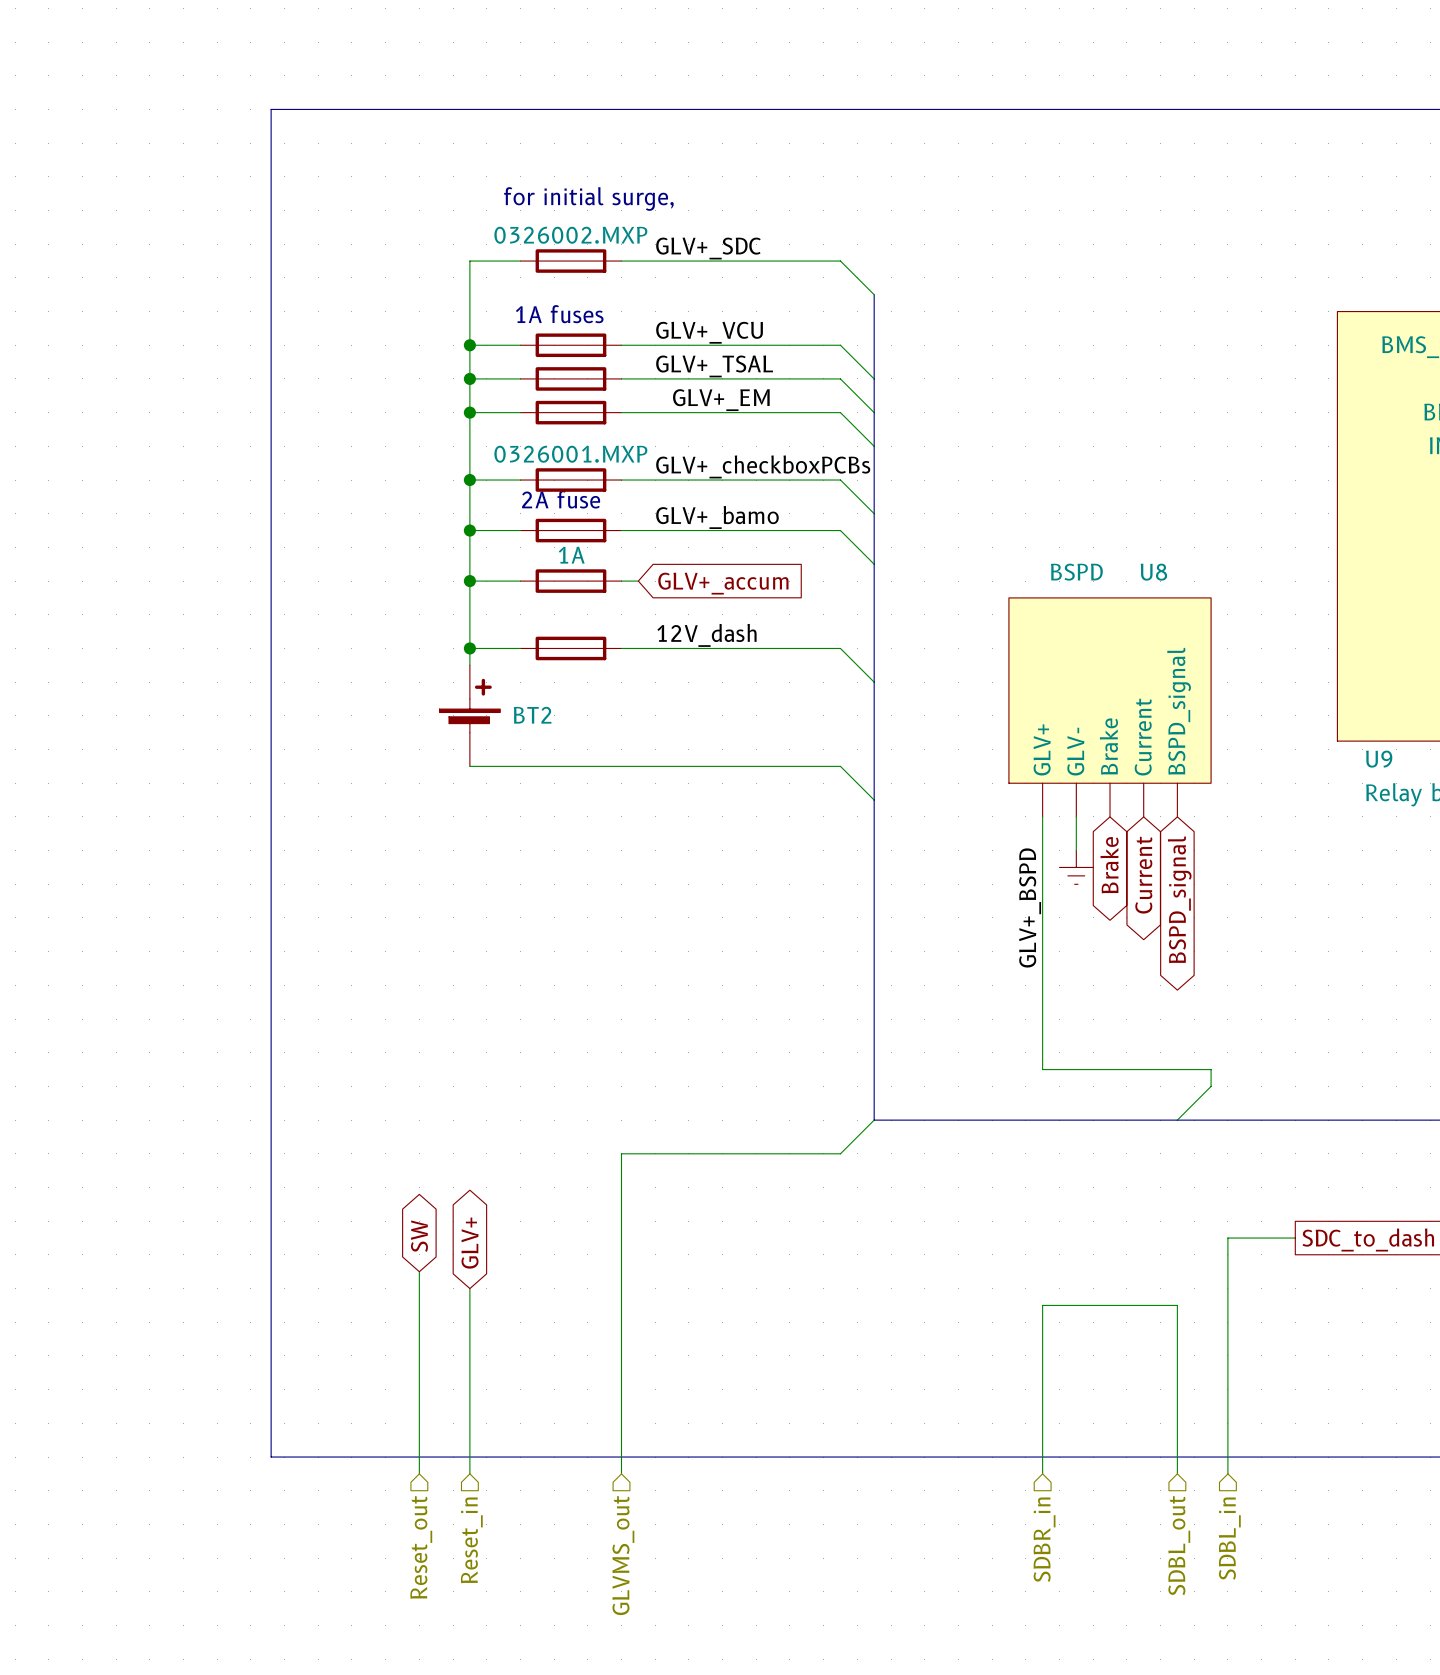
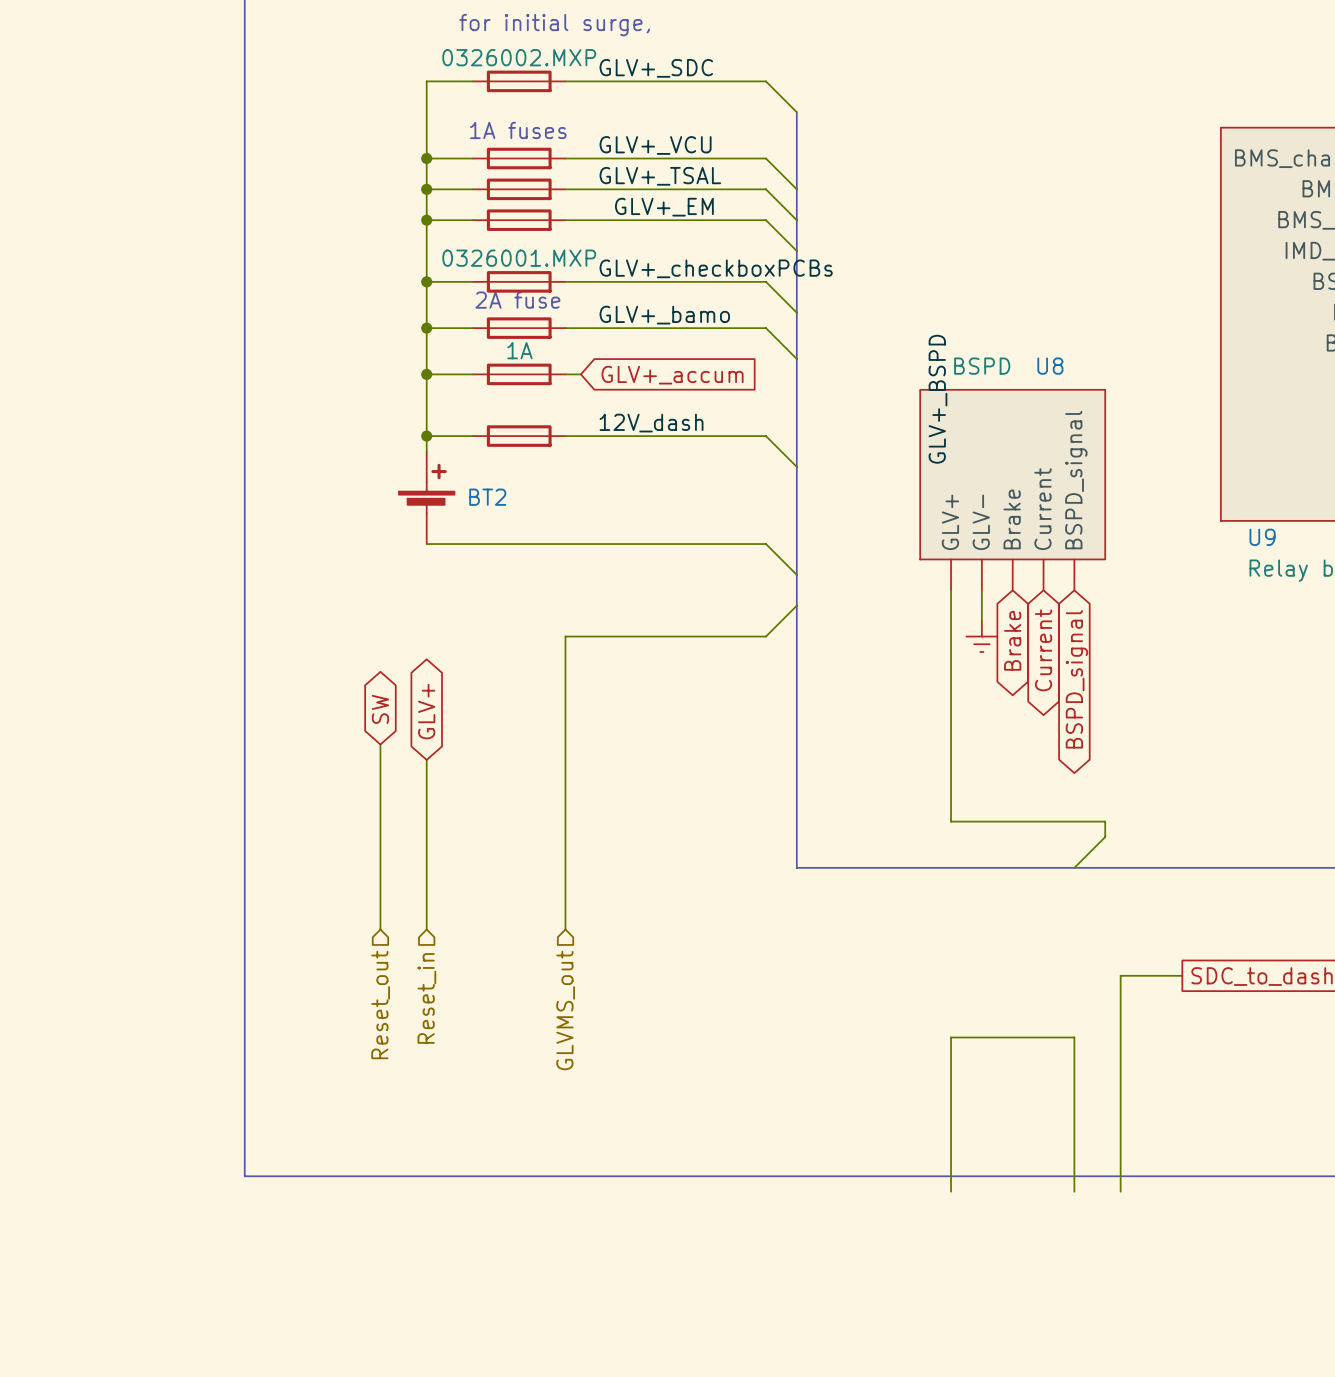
label position: GLV+_BSPD (1030, 907) -> GLV+_BSPD (937, 399)
wire: (874, 1120) (840, 1153) (621, 1153) -> (796, 605) (765, 636) (565, 636) (565, 898)
wire: (621, 1187) (621, 1473) -> none
global label position: SW (419, 1236) -> SW (380, 709)
global label position: GLV+ (470, 1243) -> GLV+ (426, 711)
wire: (419, 1271) (419, 1473) -> (380, 744) (380, 929)
wire: (469, 1288) (469, 1473) -> (426, 759) (426, 929)
hierarchical label: SDBL_in (1229, 1538) -> none
hierarchical label: SDBR_in (1044, 1539) -> none
hierarchical label position: Reset_in (471, 1540) -> Reset_in (426, 998)
hierarchical label: SDBL_out (1179, 1545) -> none
hierarchical label position: Reset_out (421, 1547) -> Reset_out (380, 1005)
hierarchical label position: GLVMS_out (623, 1555) -> GLVMS_out (565, 1010)

